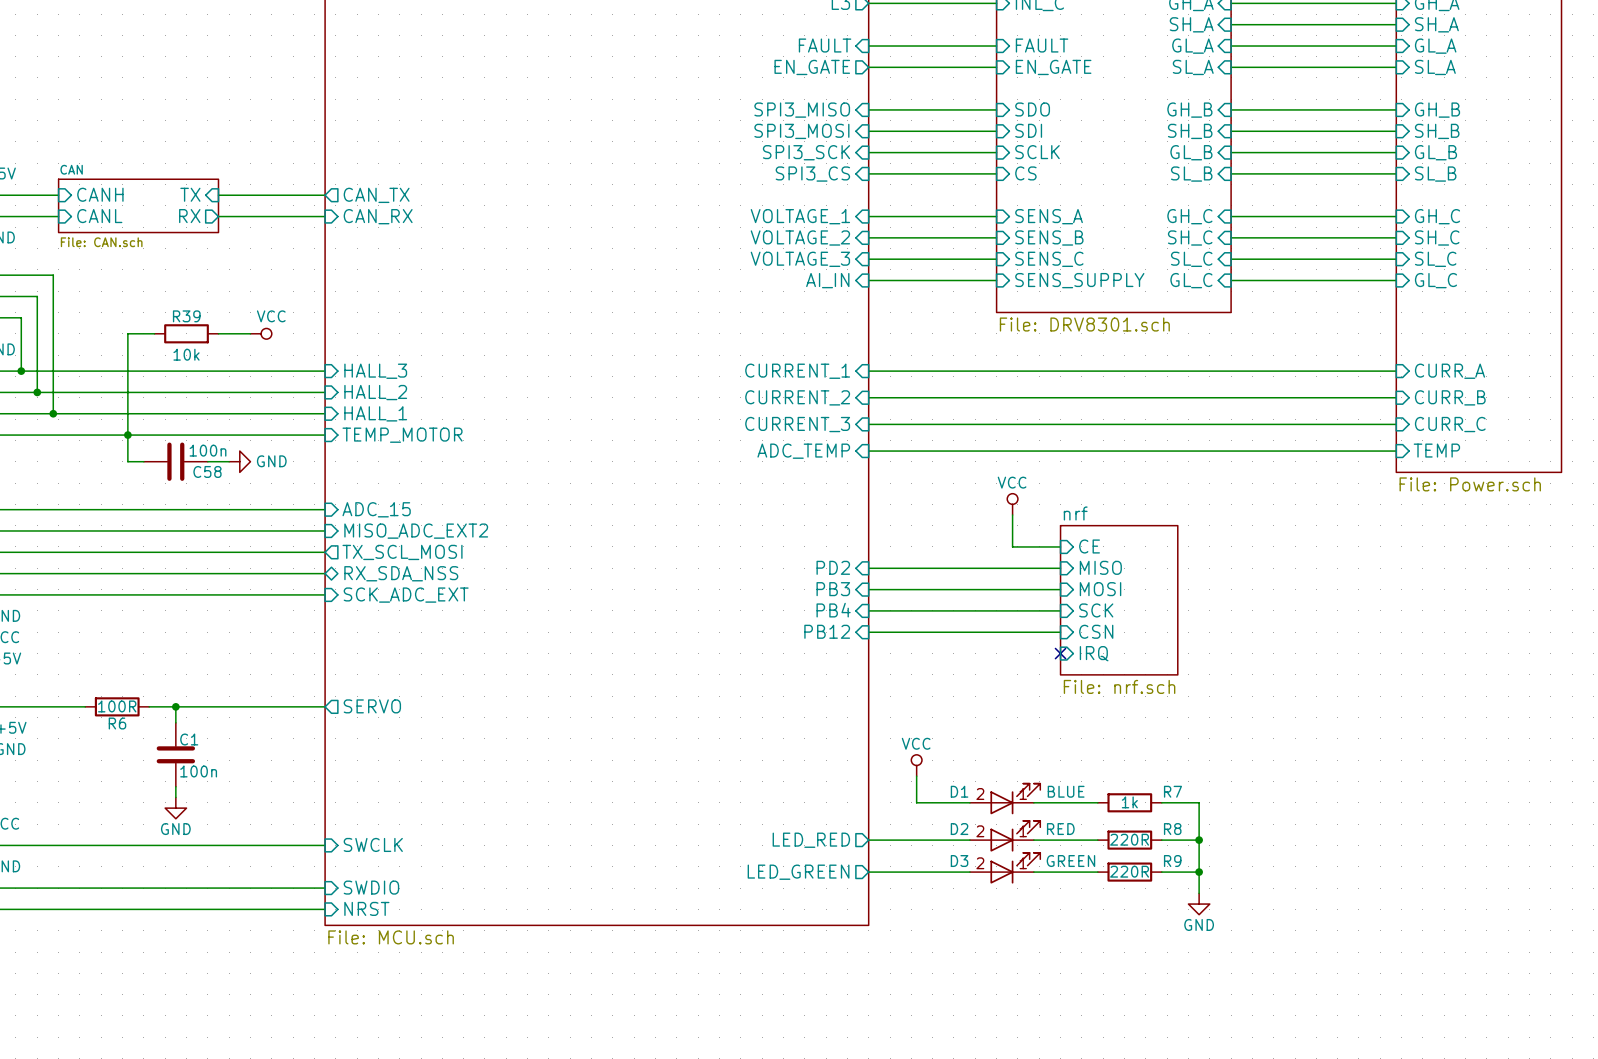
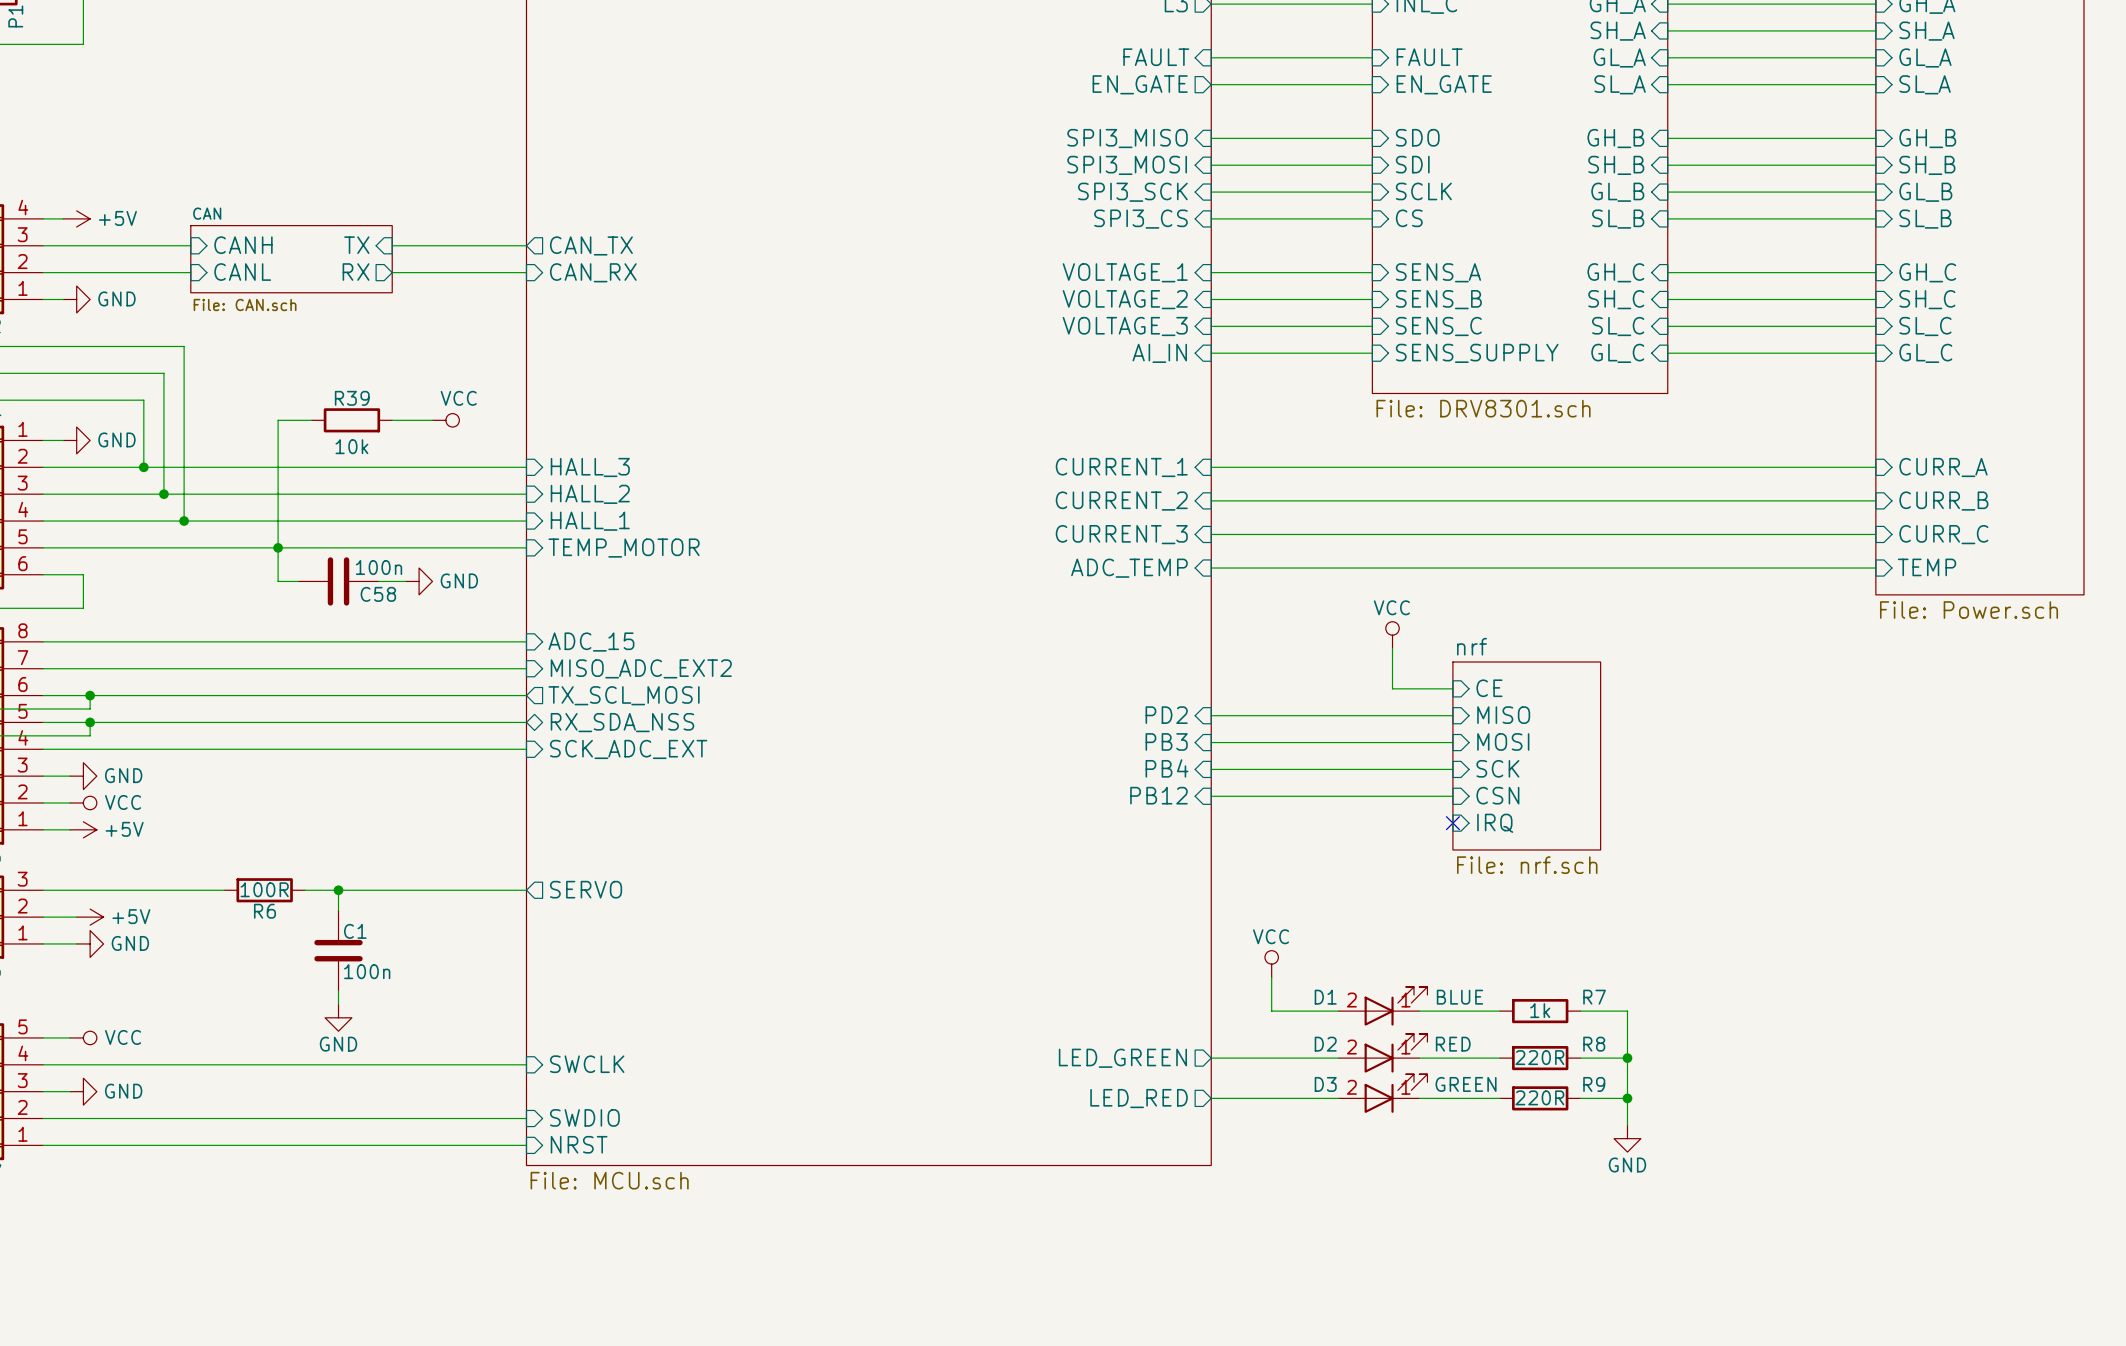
sheet pin: LED_RED (811, 840) -> LED_GREEN (1122, 1058)
sheet pin: LED_GREEN (798, 872) -> LED_RED (1139, 1098)

